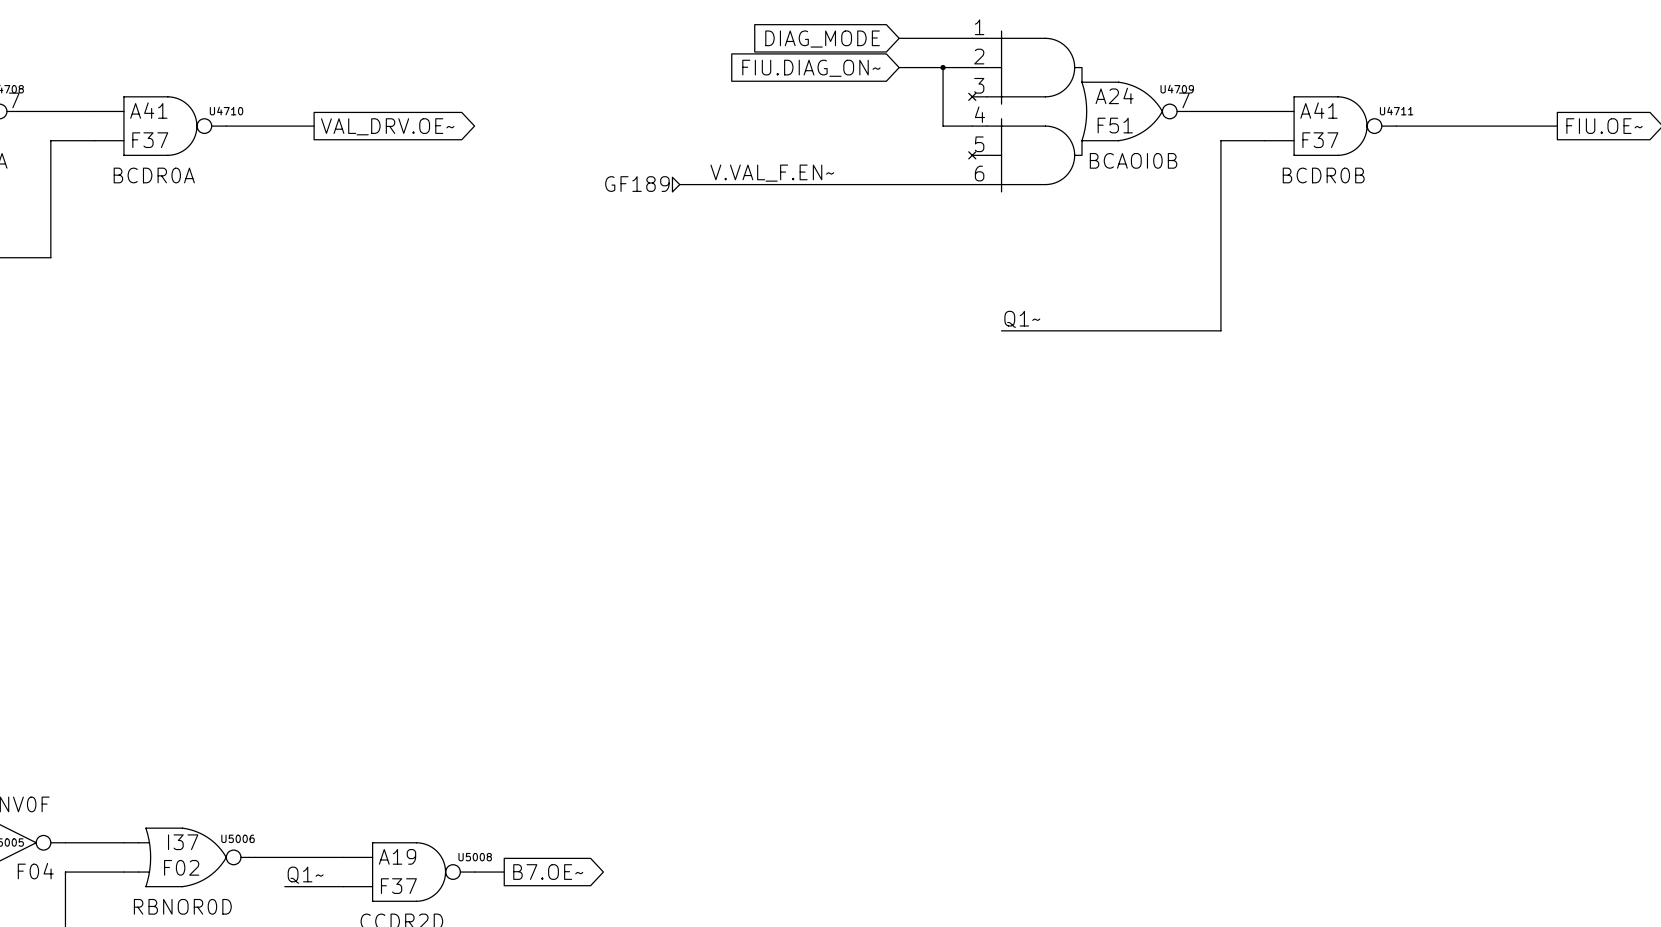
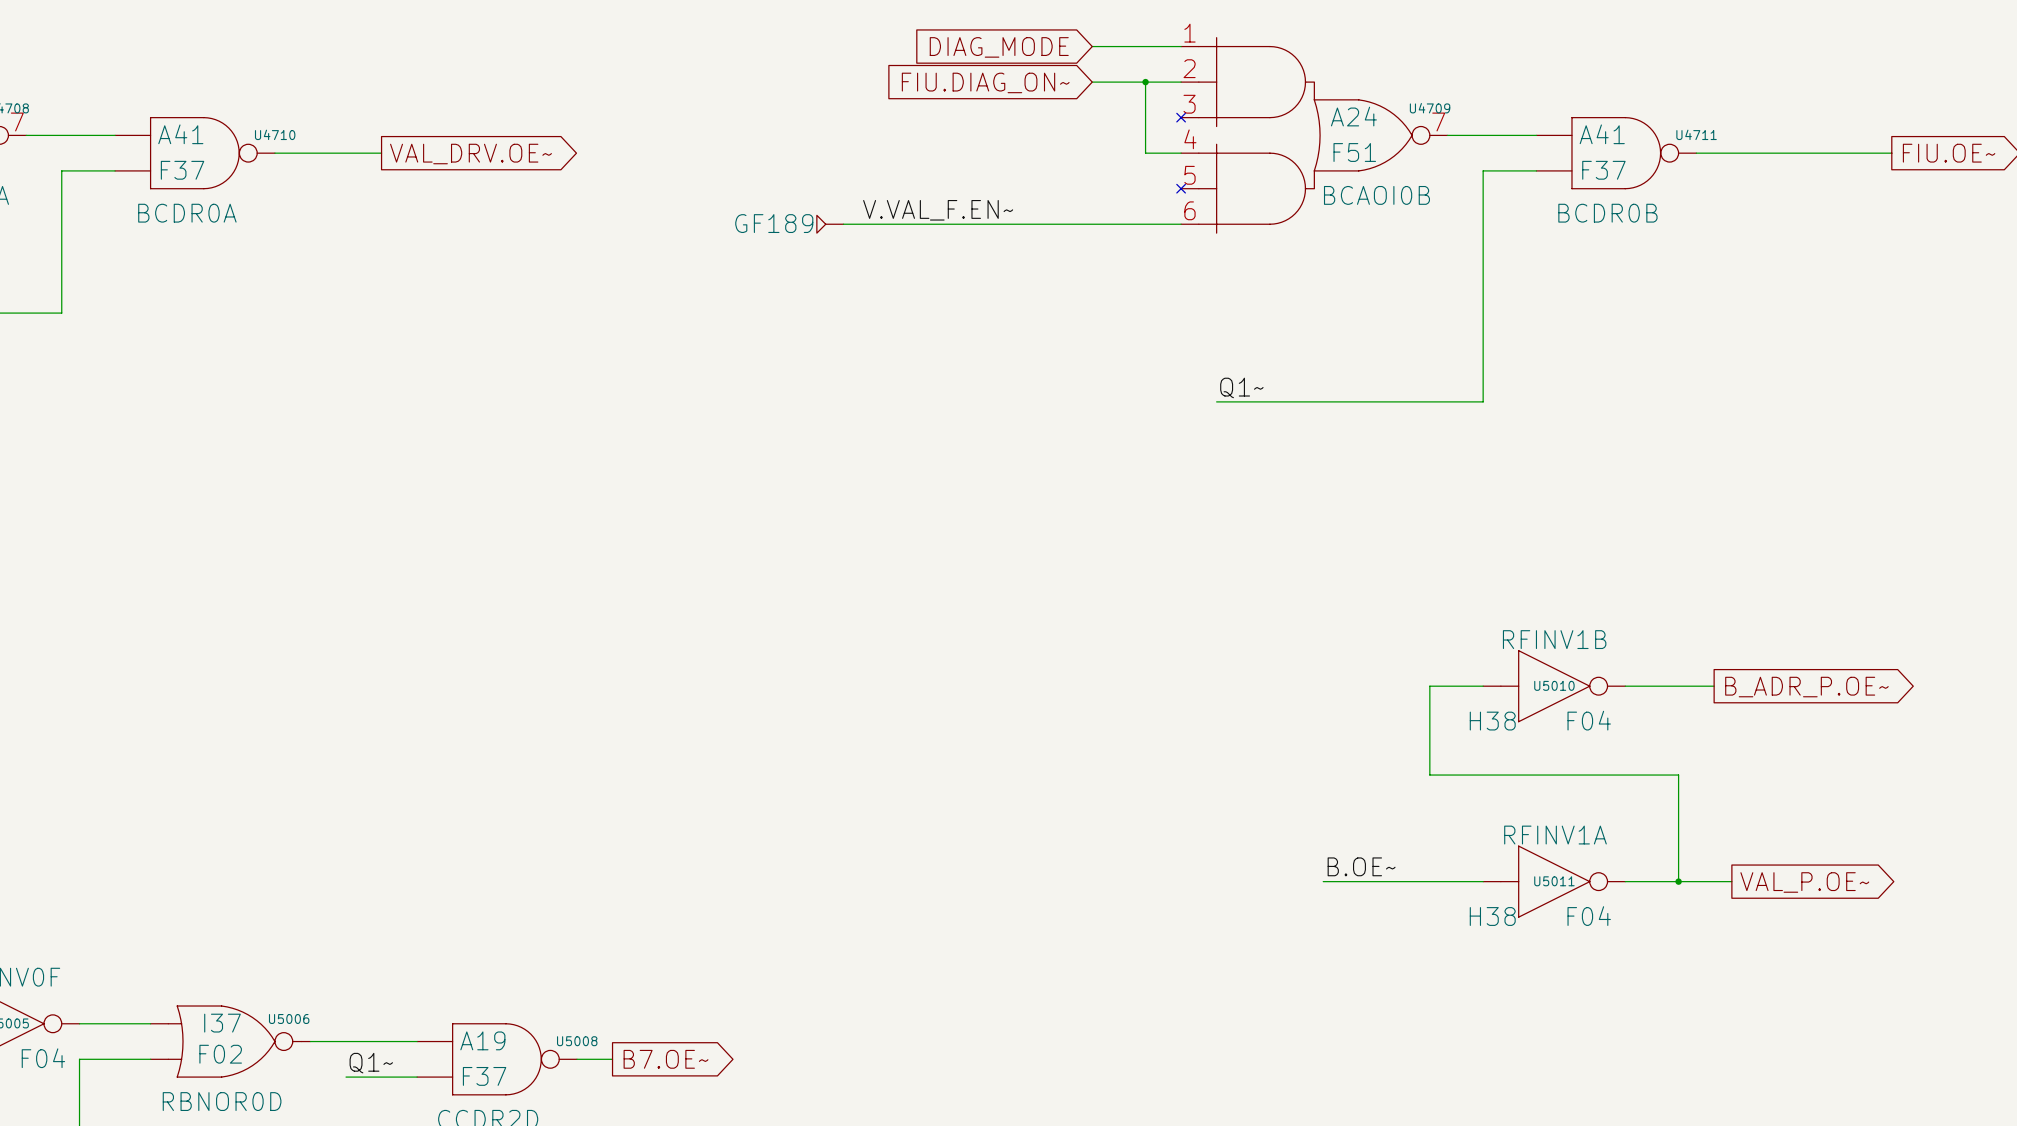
wire: none -> (1483, 686) (1429, 686) (1429, 775) (1678, 775) (1678, 881)
U5010: none -> F04 (1554, 686)
wire: none -> (1625, 686) (1714, 686)
global label: none -> B_ADR_P.OE~ (1806, 687)
label: none -> B.OE~ (1361, 866)
wire: none -> (1323, 881) (1483, 881)
U5011: none -> F04 (1554, 881)
wire: none -> (1625, 881) (1731, 881)
junction: none -> (1678, 881)
global label: none -> VAL_P.OE~ (1804, 882)

